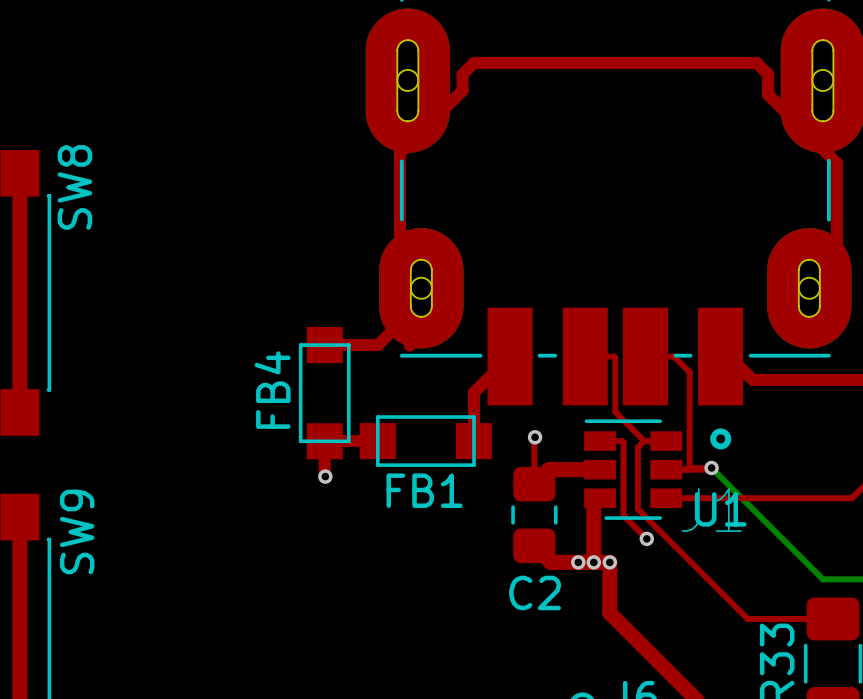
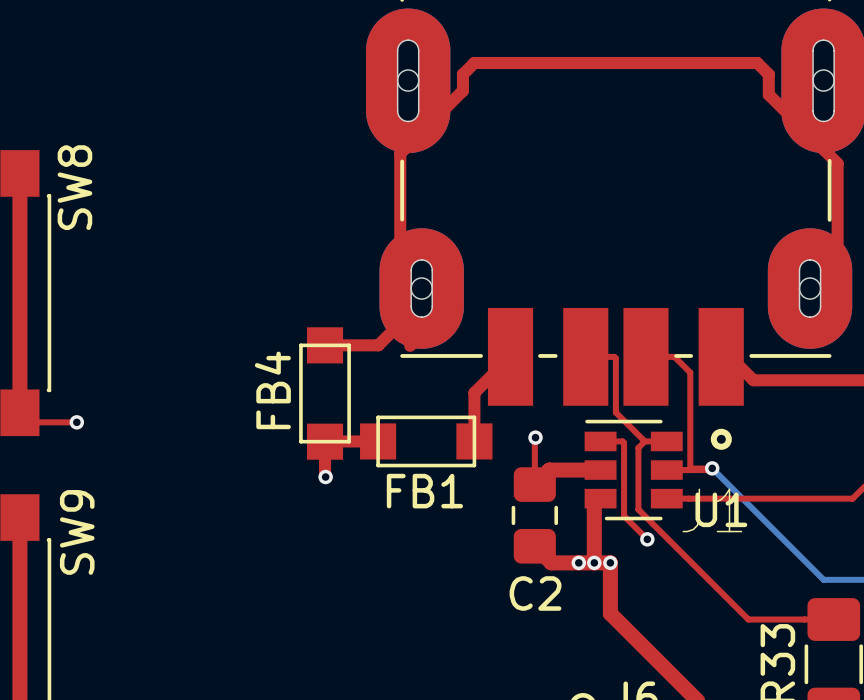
top track: none -> (19, 412) (29, 422) (76, 422)
via: none -> (76, 422)

